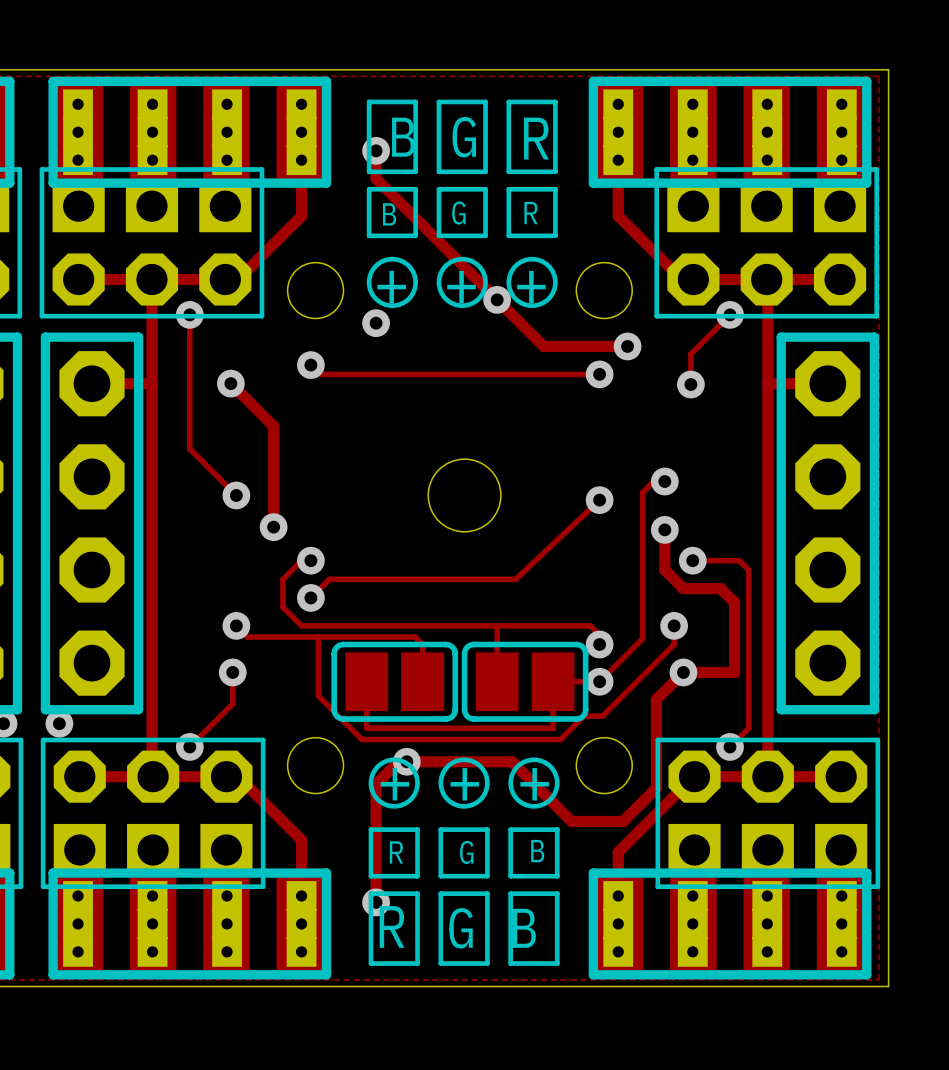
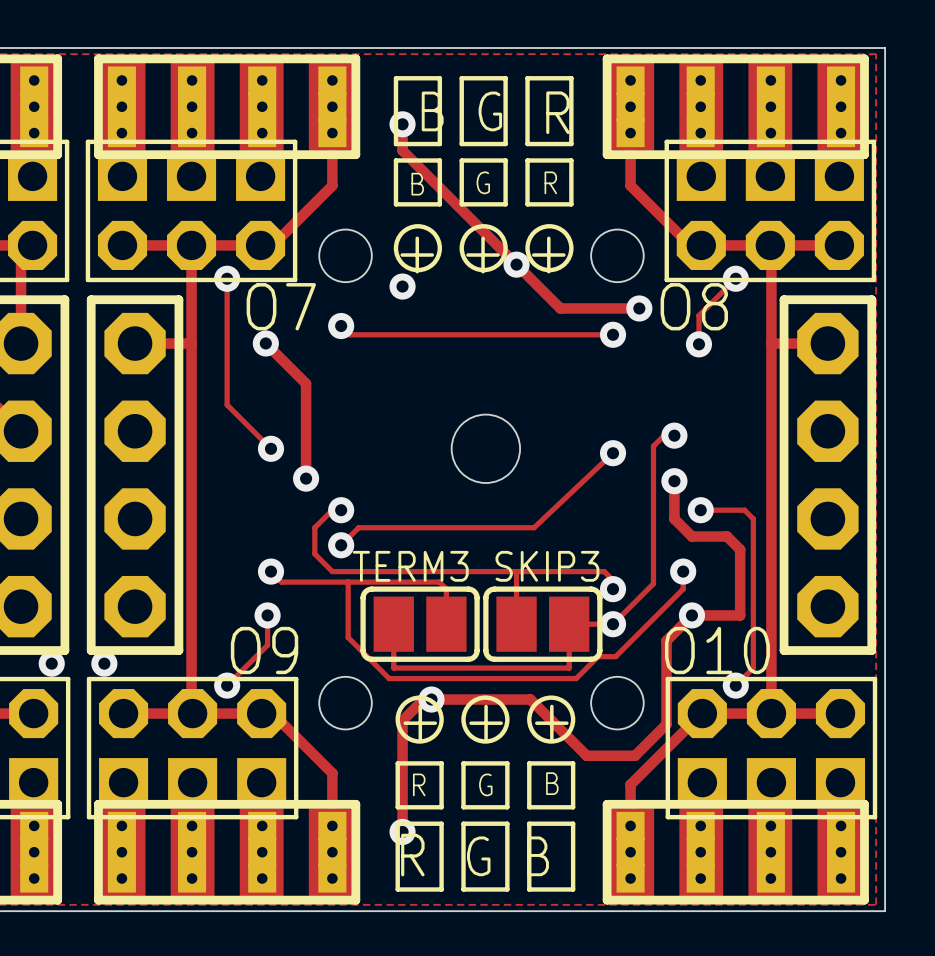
O7 name: none -> O7 (281, 306)
O8 name: none -> O8 (694, 306)
TERM3 name: none -> TERM3 (410, 566)
SKIP3 name: none -> SKIP3 (547, 566)
O9 name: none -> O9 (264, 650)
O10 name: none -> O10 (717, 650)

